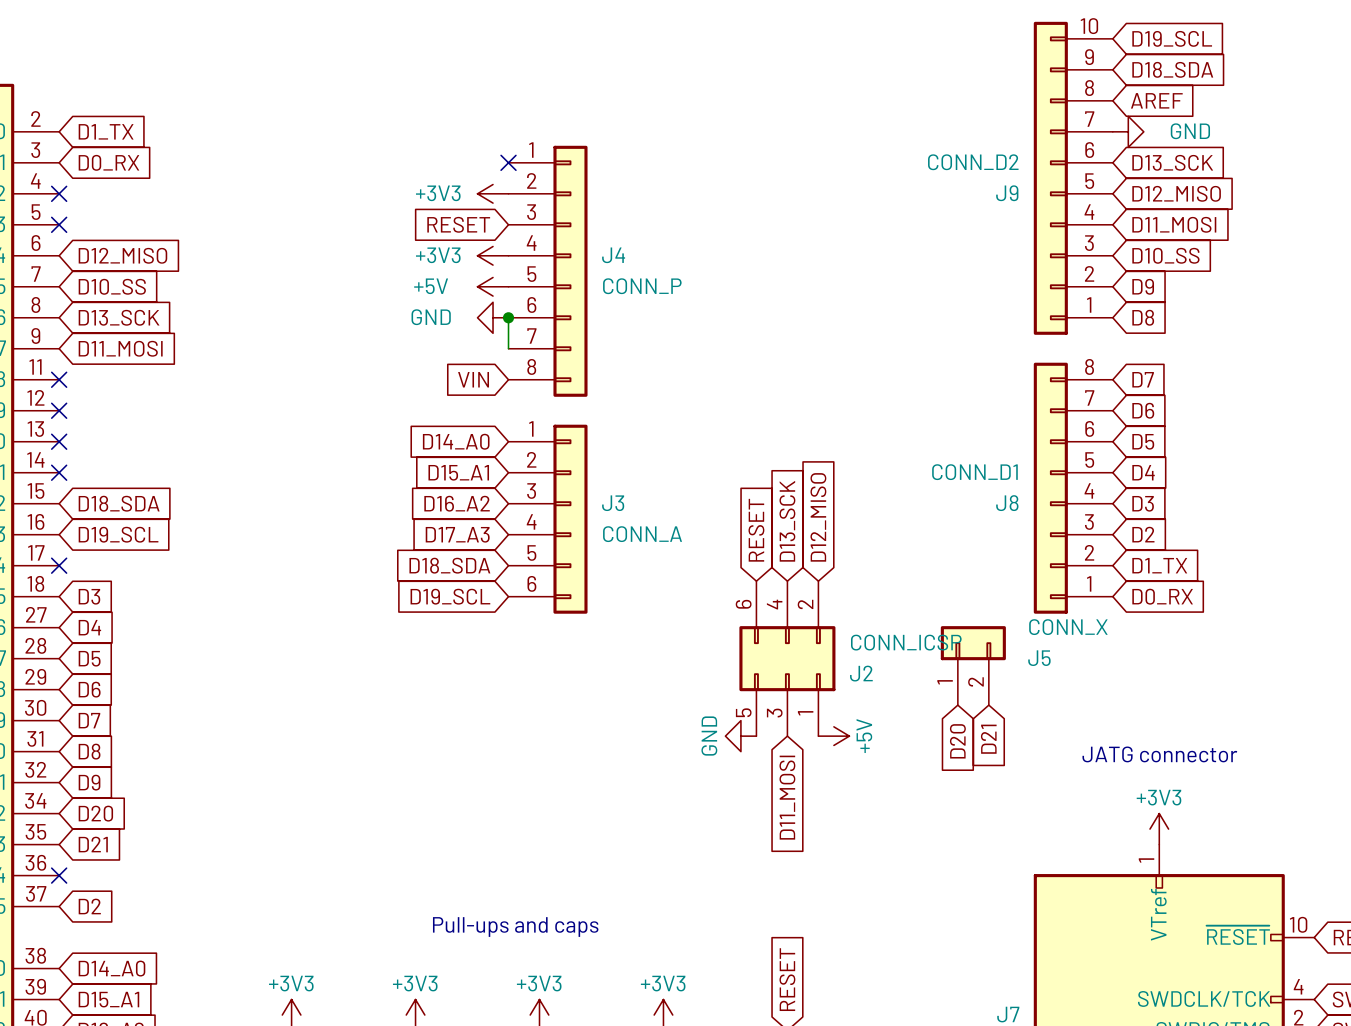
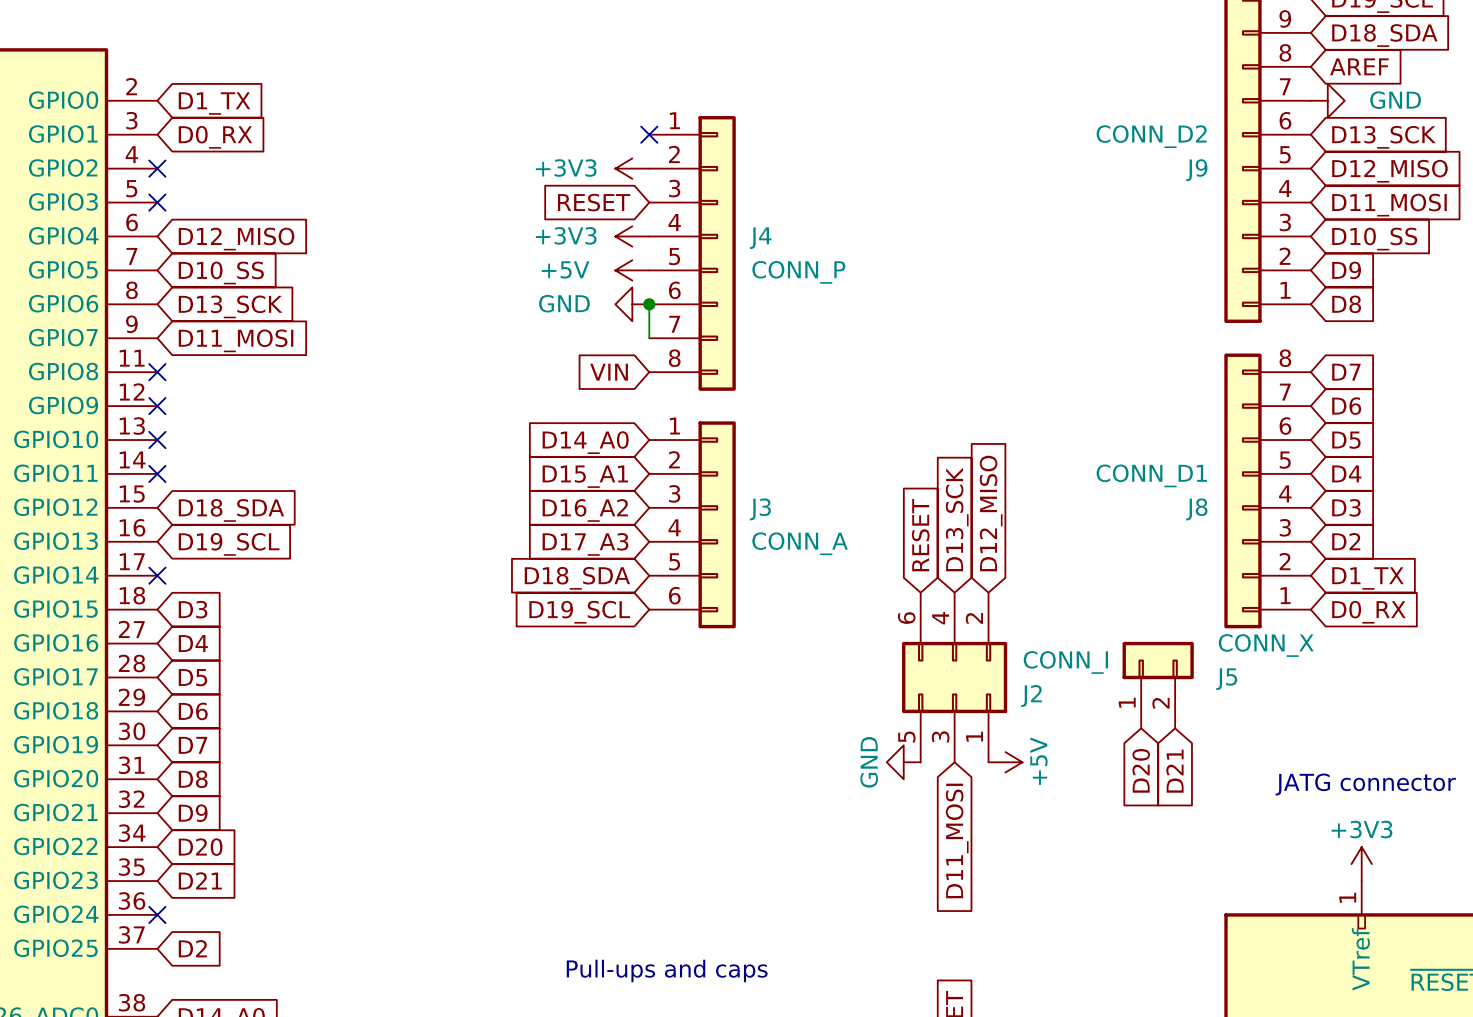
J2 value: CONN_ICSP (906, 642) -> CONN_I (1065, 662)

